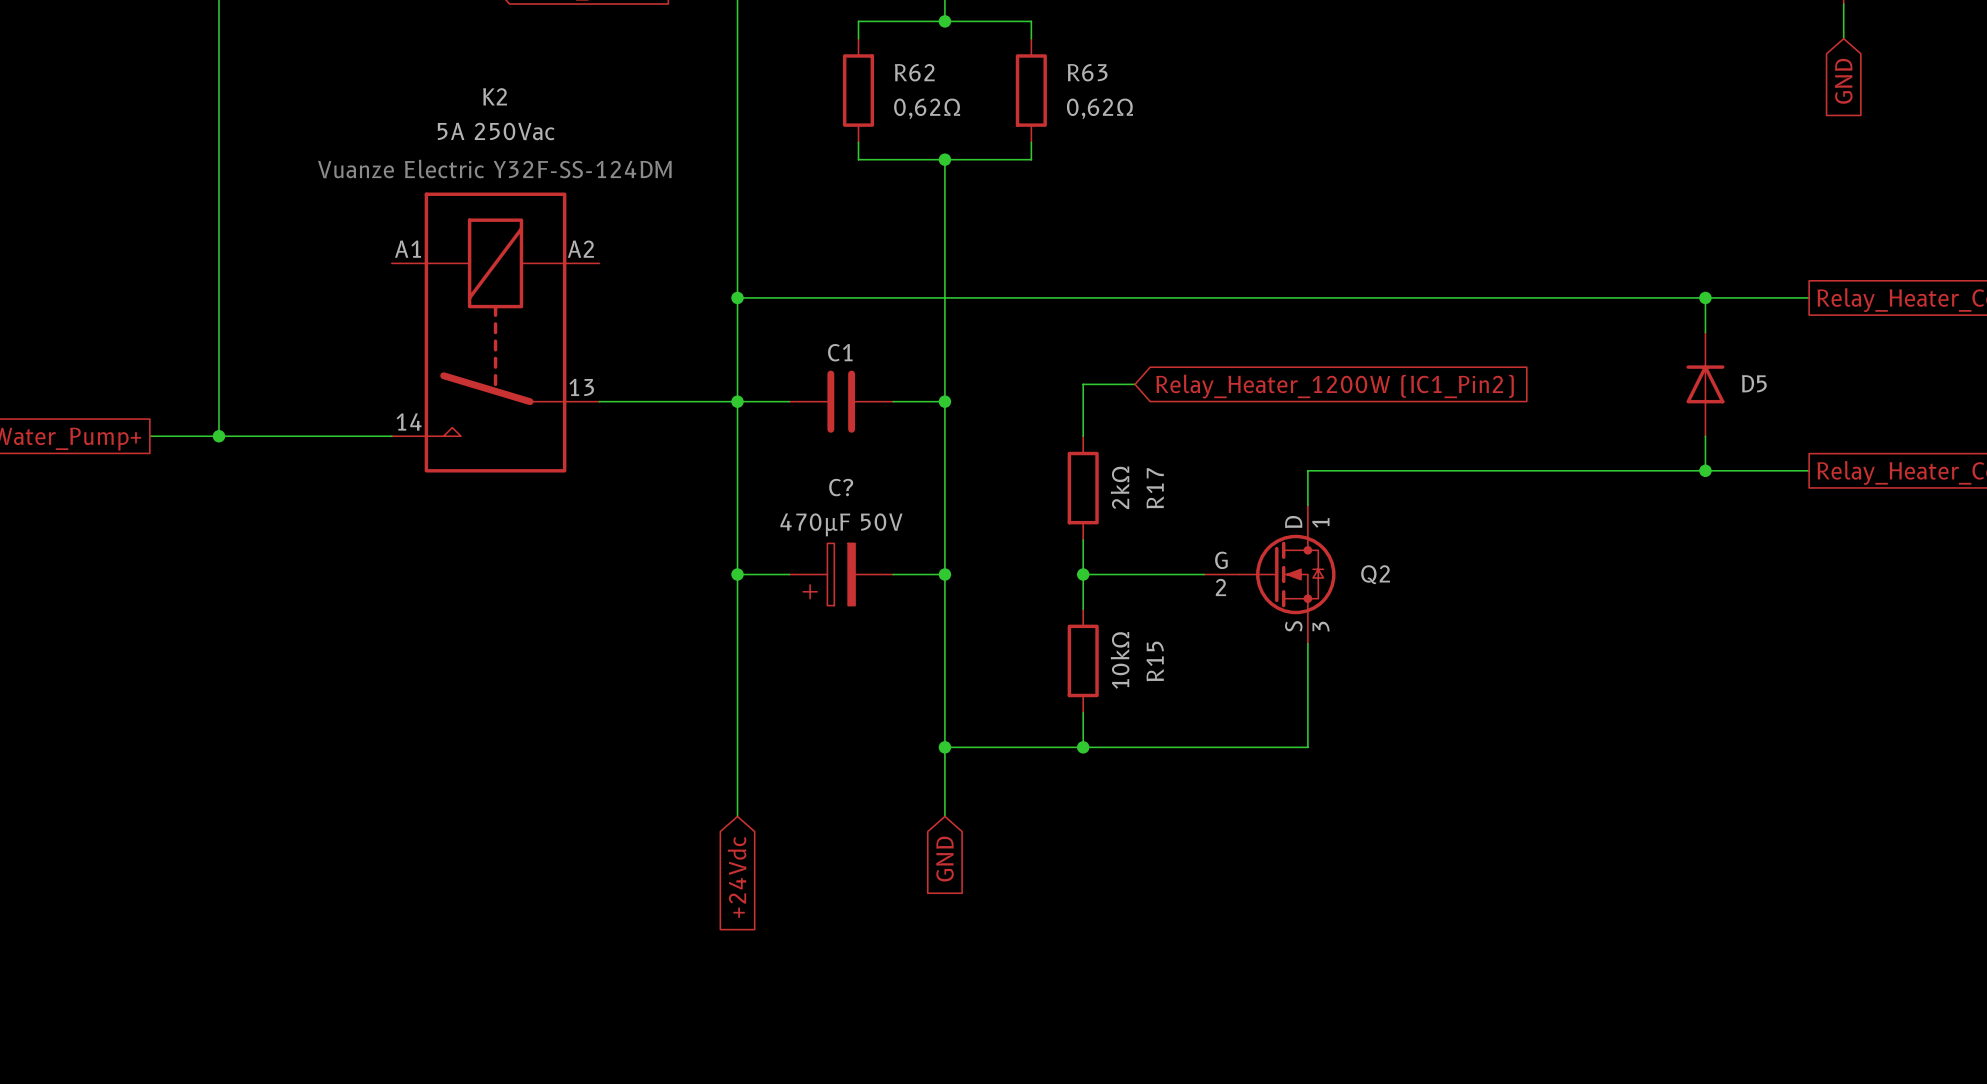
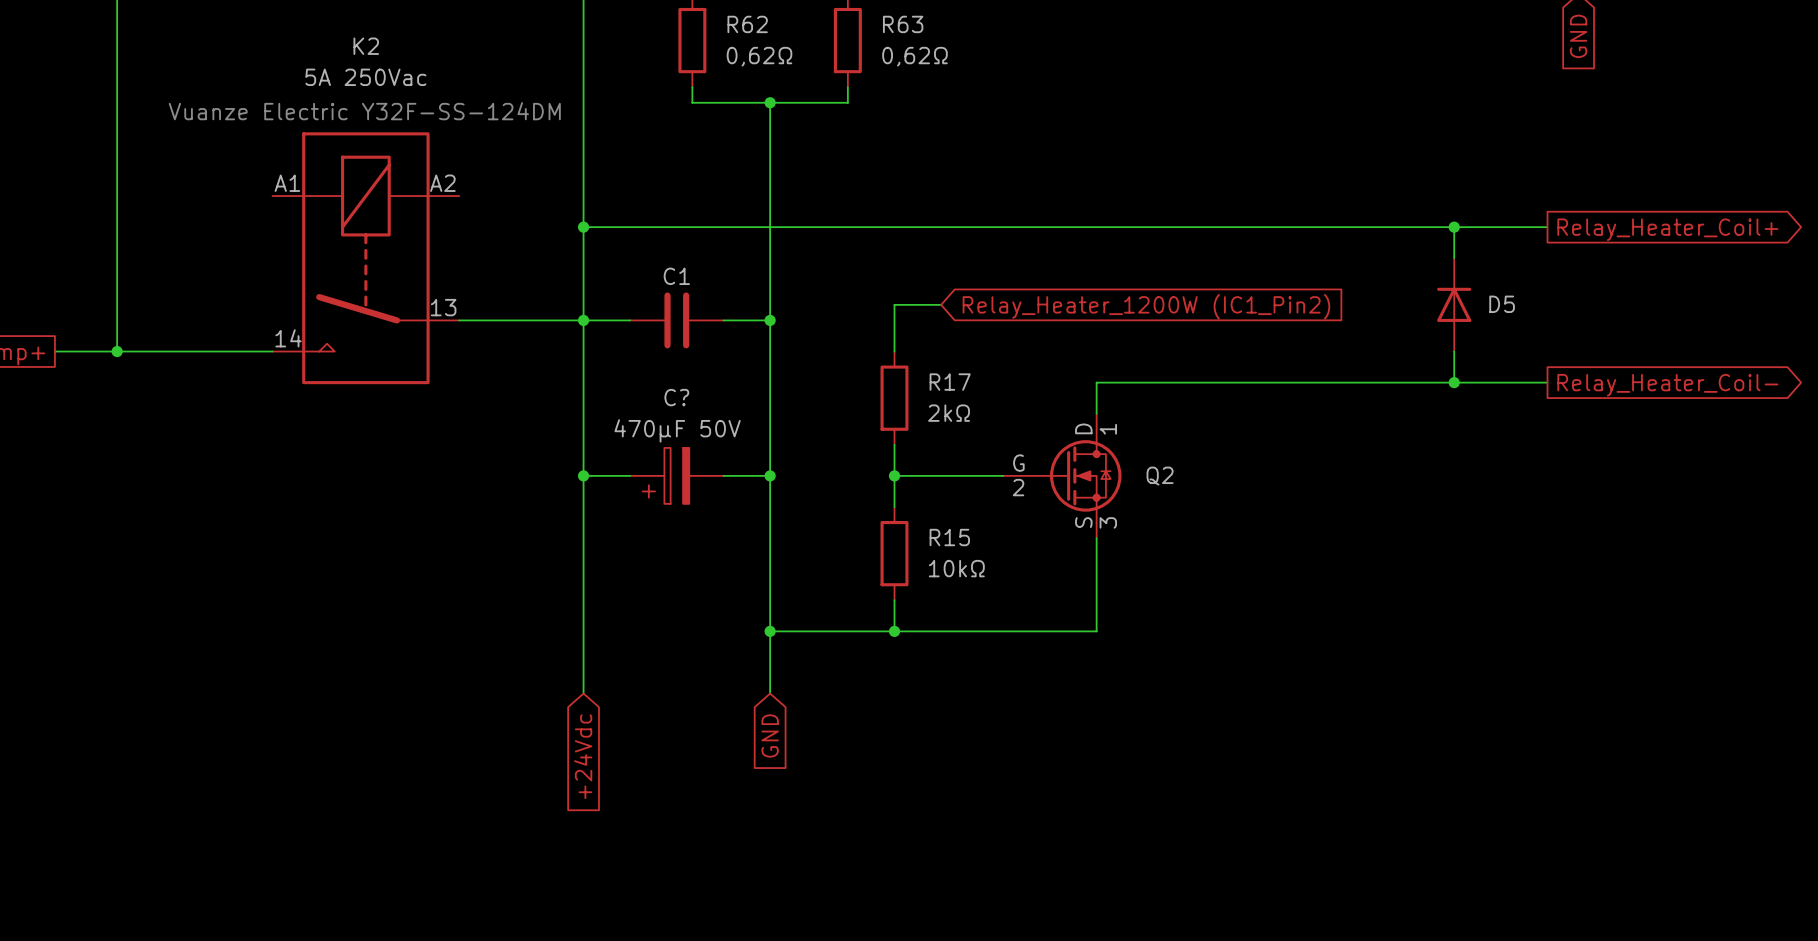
R17 value rotation: 0° (1120, 487) -> 90° clockwise (949, 413)
R17 name rotation: 0° (1155, 488) -> 90° clockwise (950, 382)
R15 value rotation: 0° (1120, 660) -> 90° clockwise (956, 568)
R15 name rotation: 0° (1155, 661) -> 90° clockwise (949, 537)

